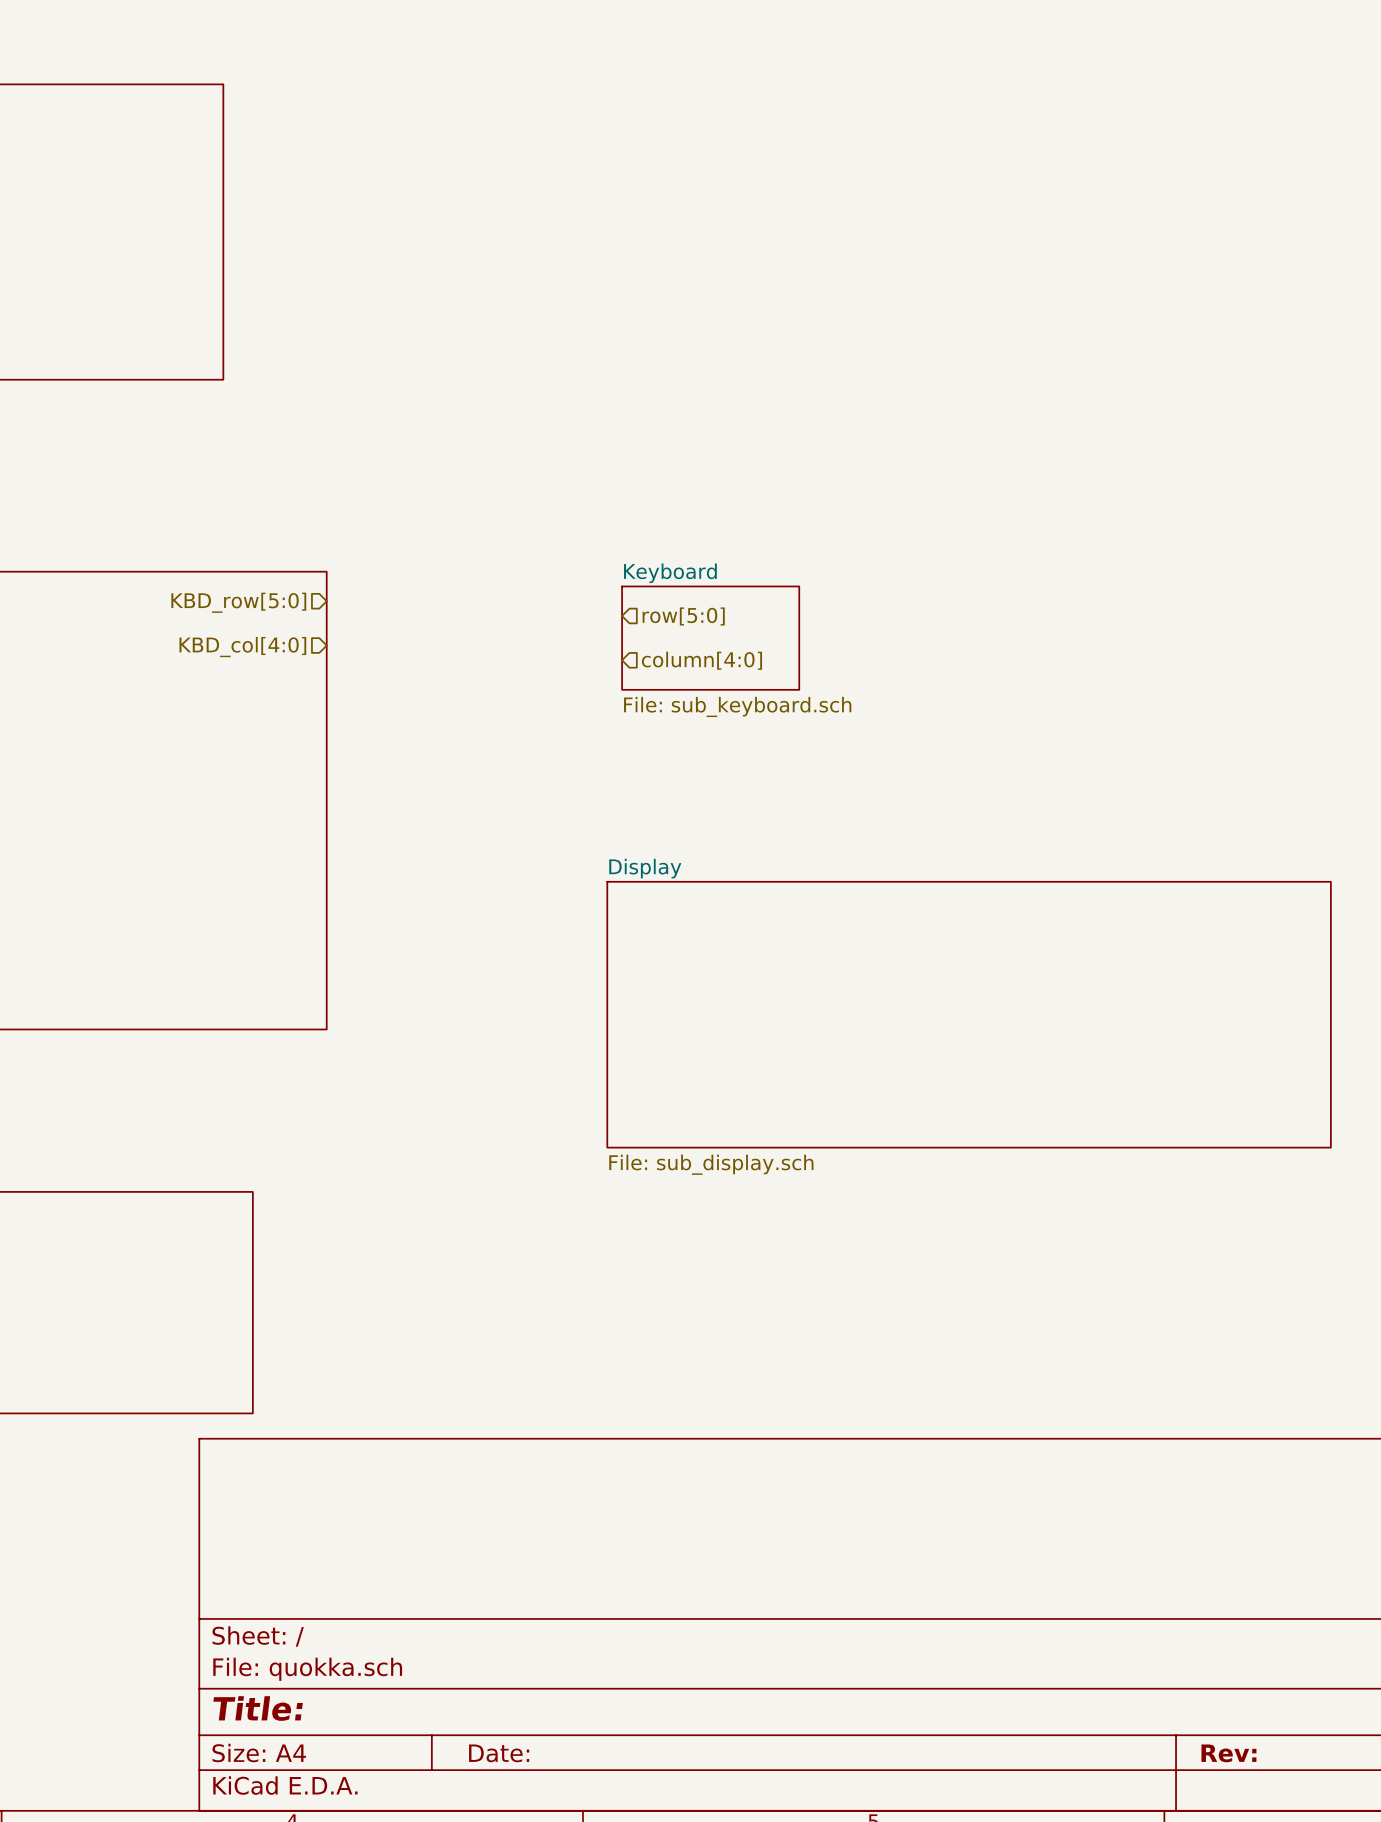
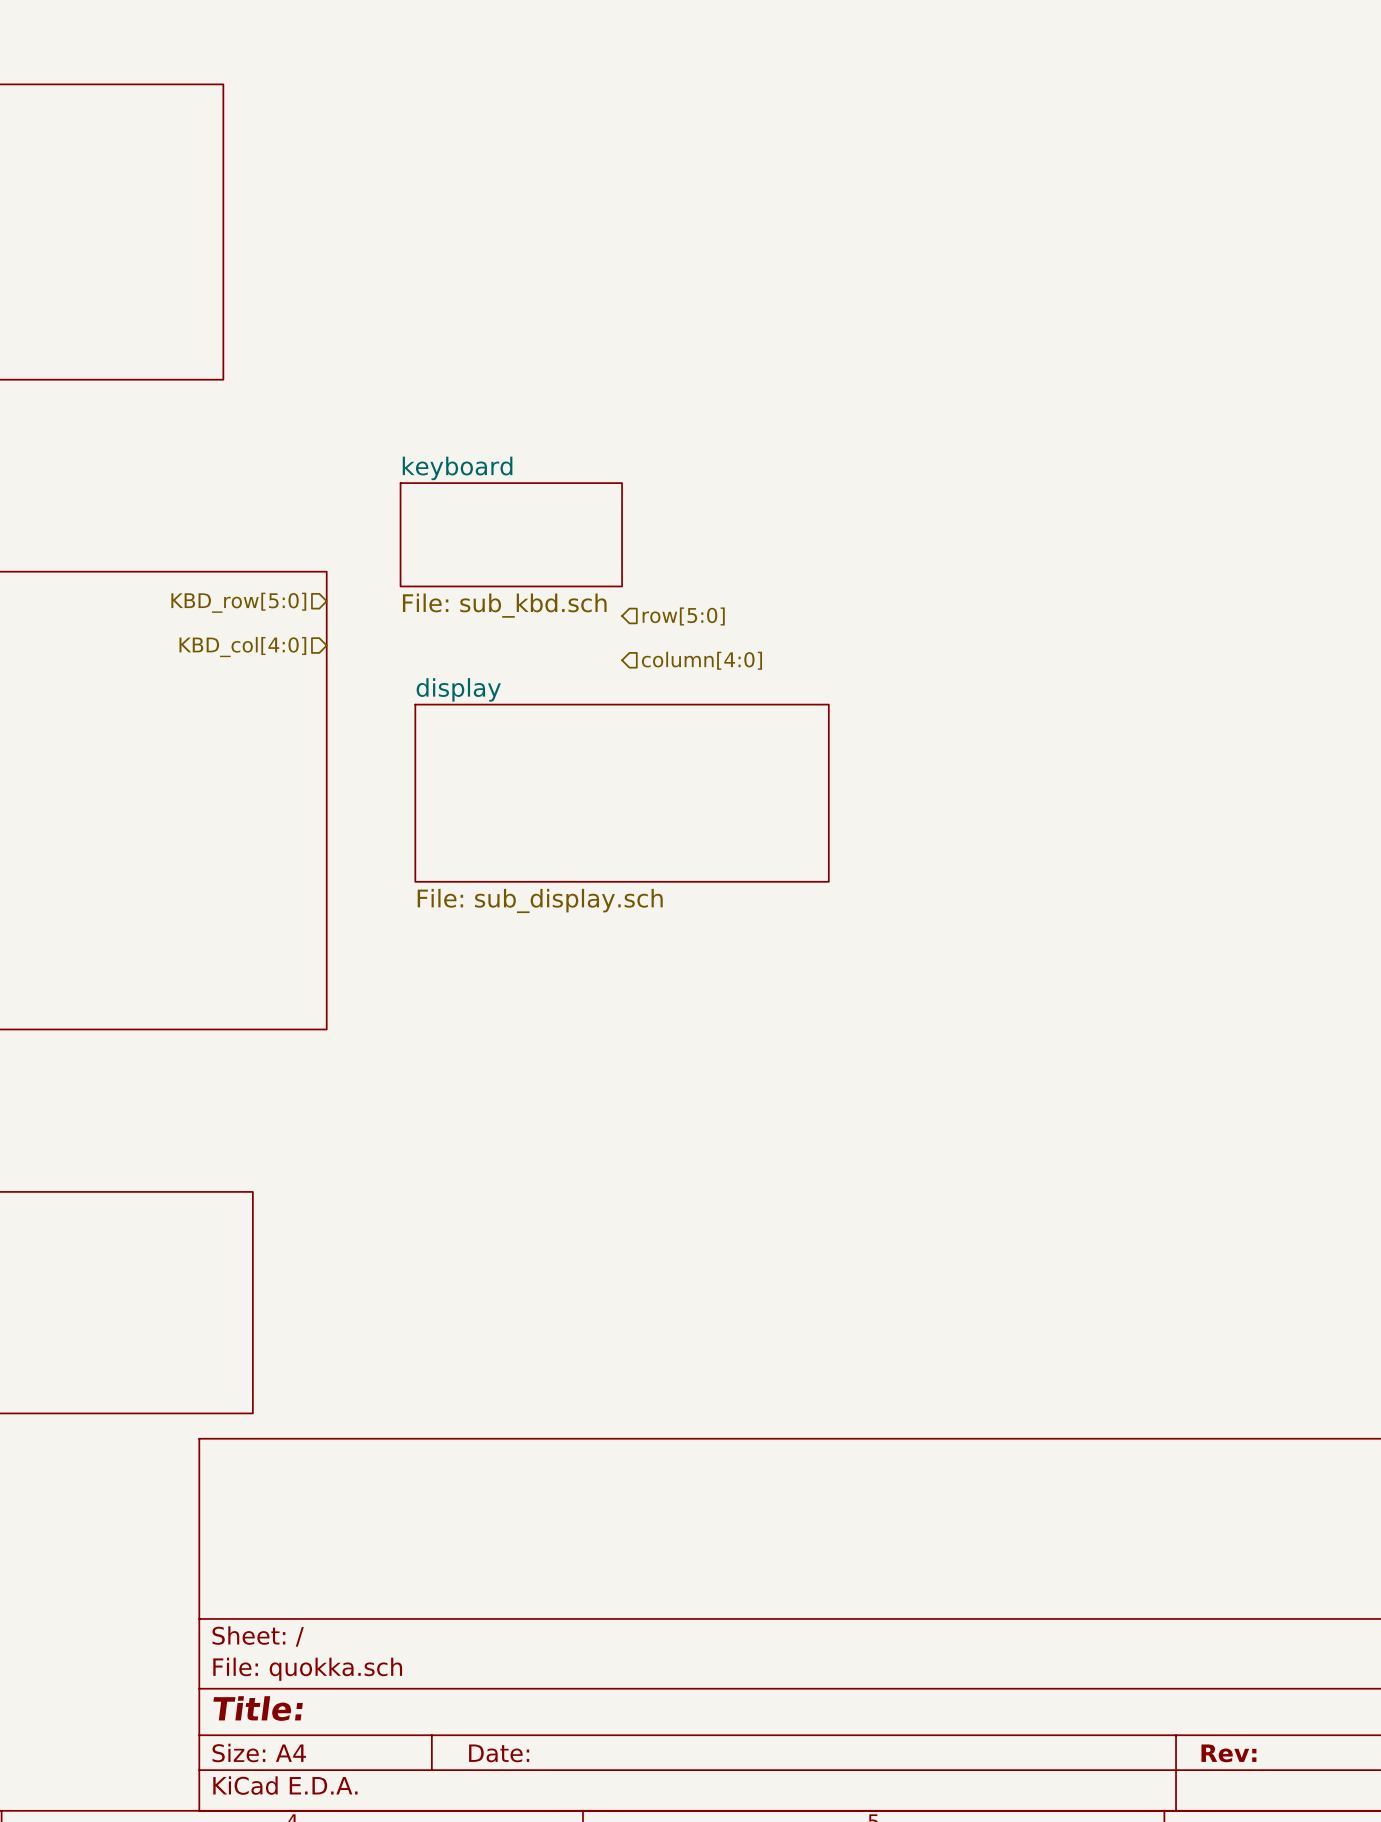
sheet keyboard: none -> File: sub_kbd.sch (511, 534)
sheet Keyboard: File: sub_keyboard.sch (710, 638) -> none
sheet display: none -> File: sub_display.sch (622, 793)
sheet Display: File: sub_display.sch (969, 1014) -> none

